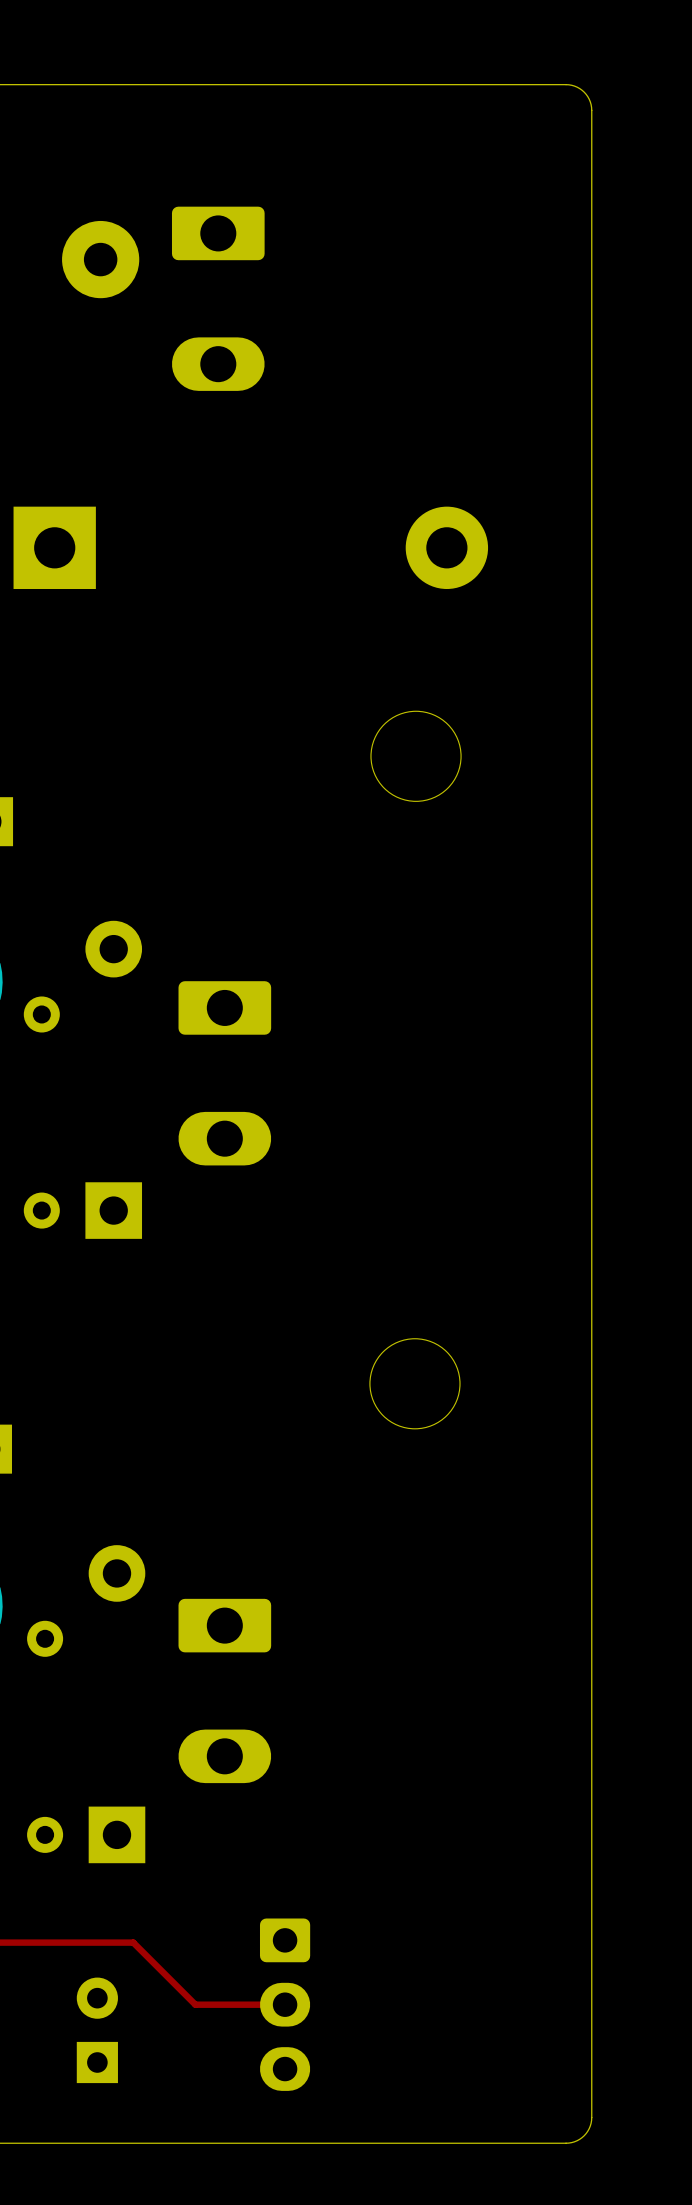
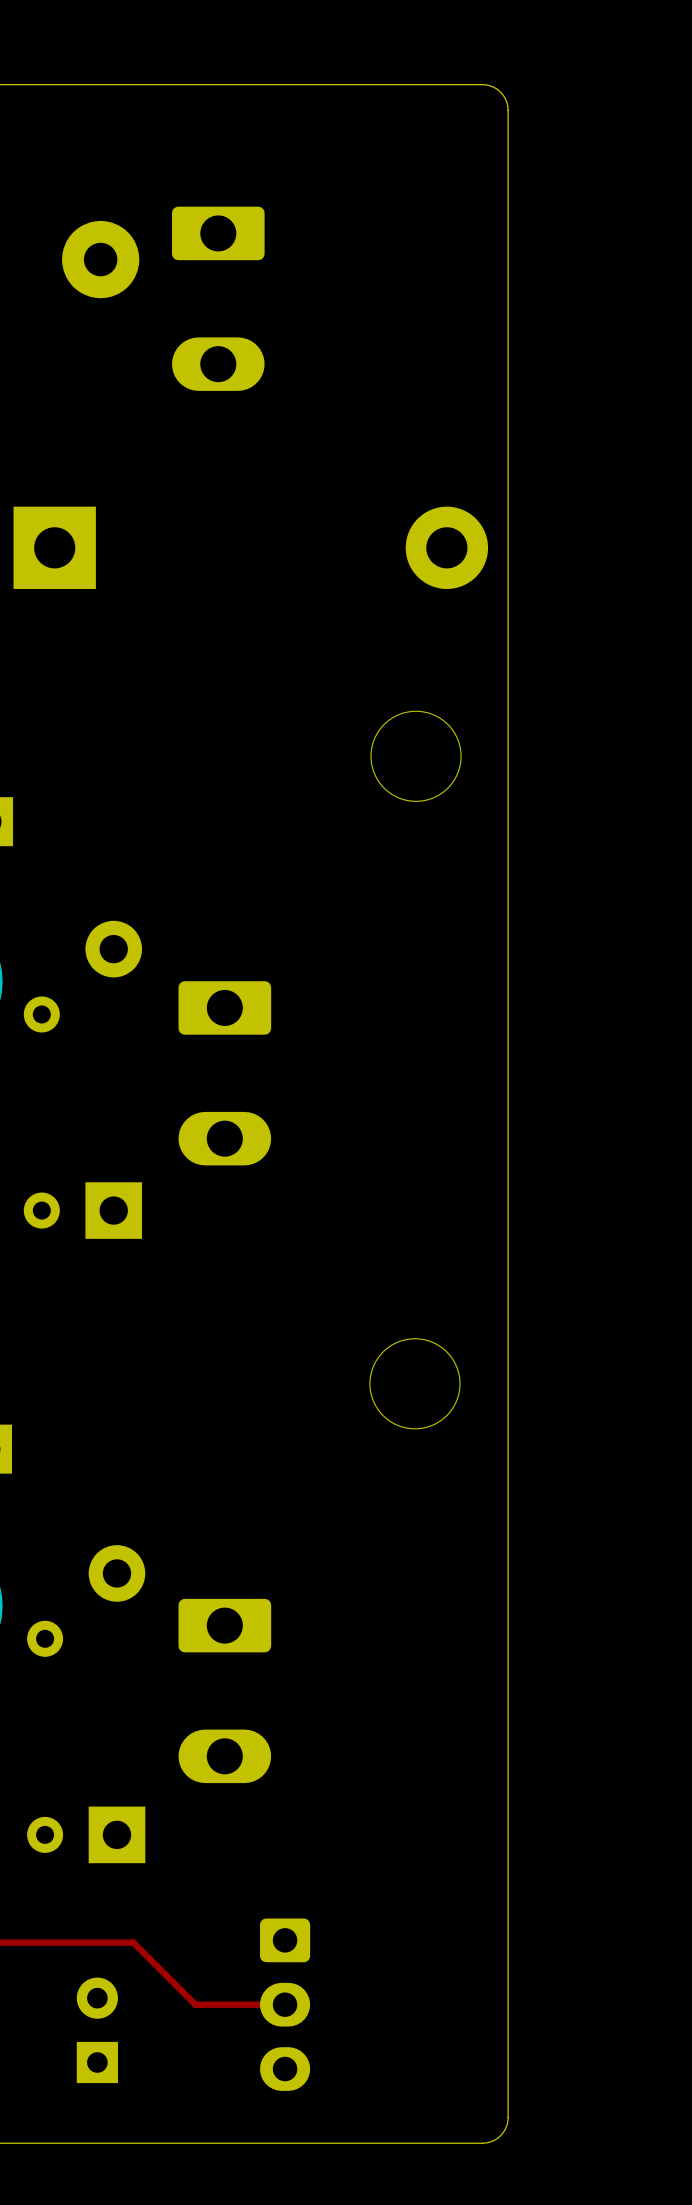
board edge: (482, 84) (571, 85) (586, 94) (591, 110) (591, 2117) (586, 2133) (571, 2142) (482, 2143) -> (482, 84) (490, 86) (500, 92) (506, 101) (508, 110) (508, 2117) (505, 2128) (500, 2135) (490, 2141) (482, 2143)

